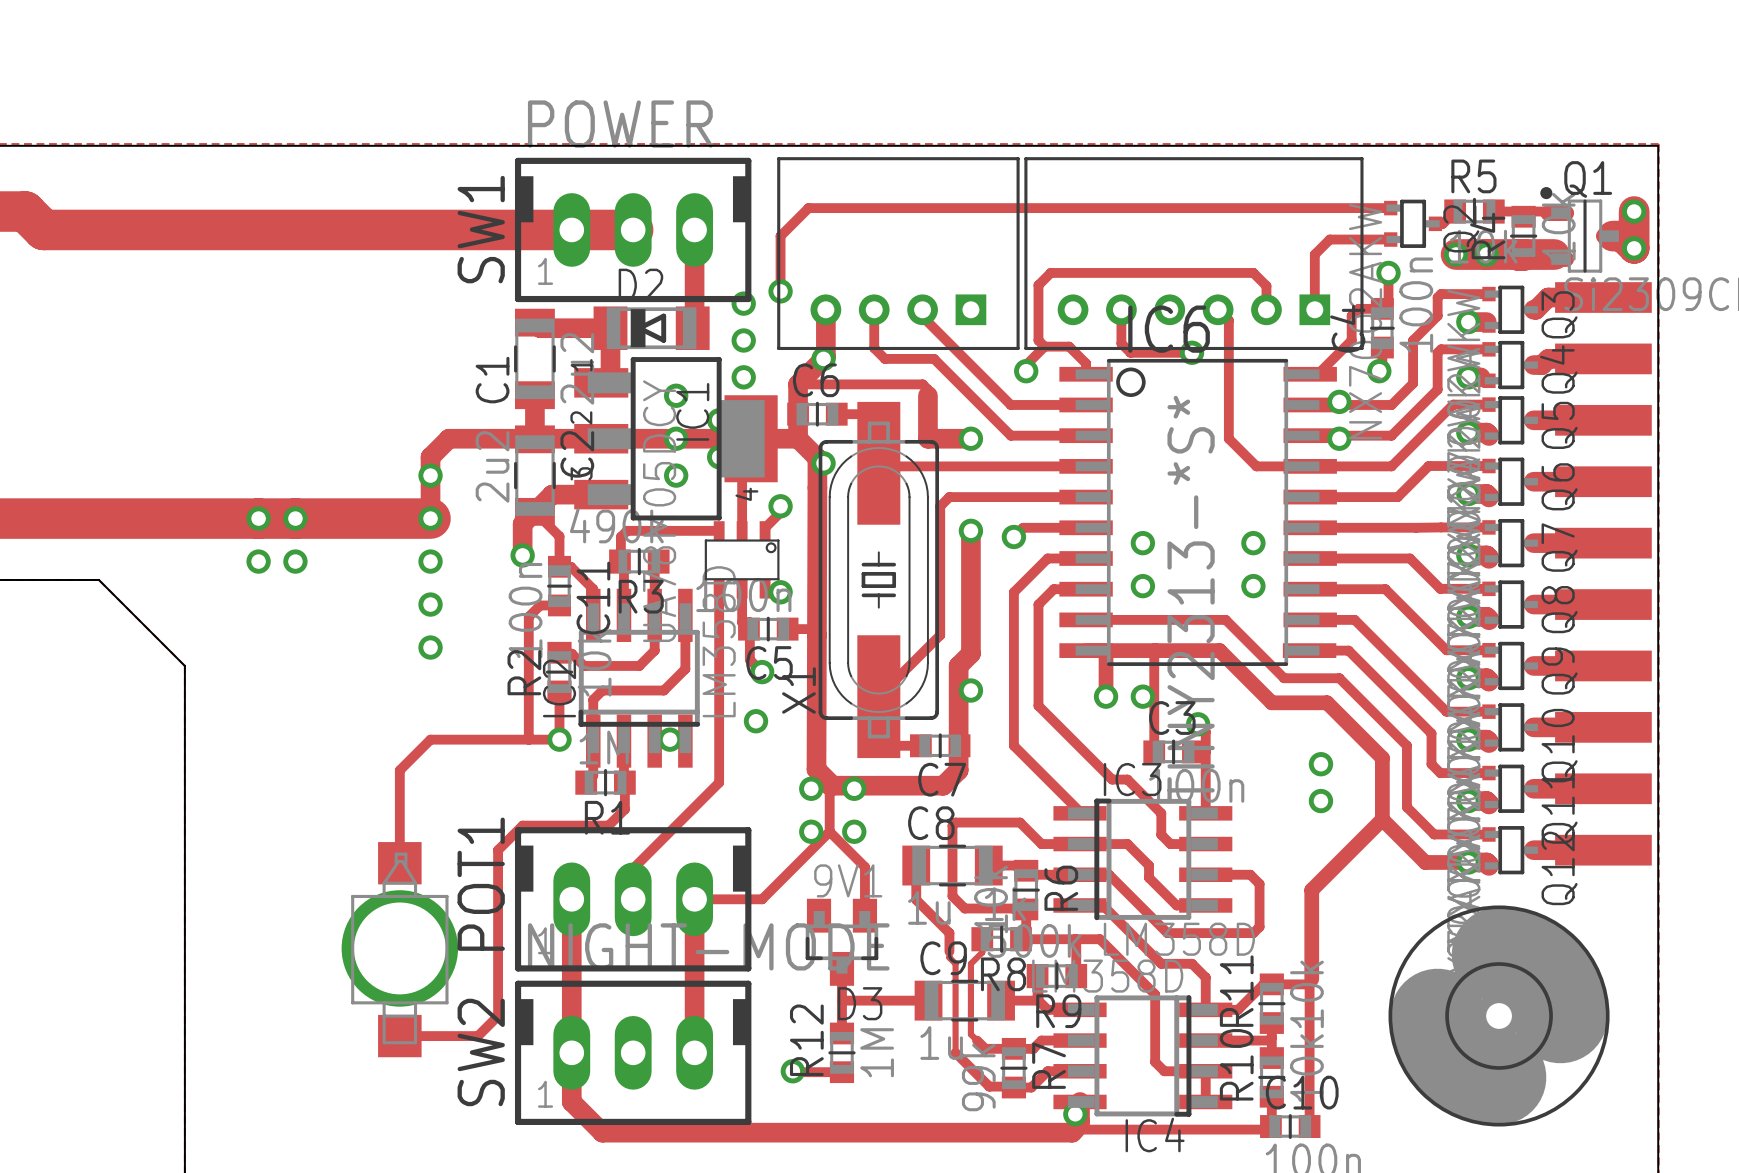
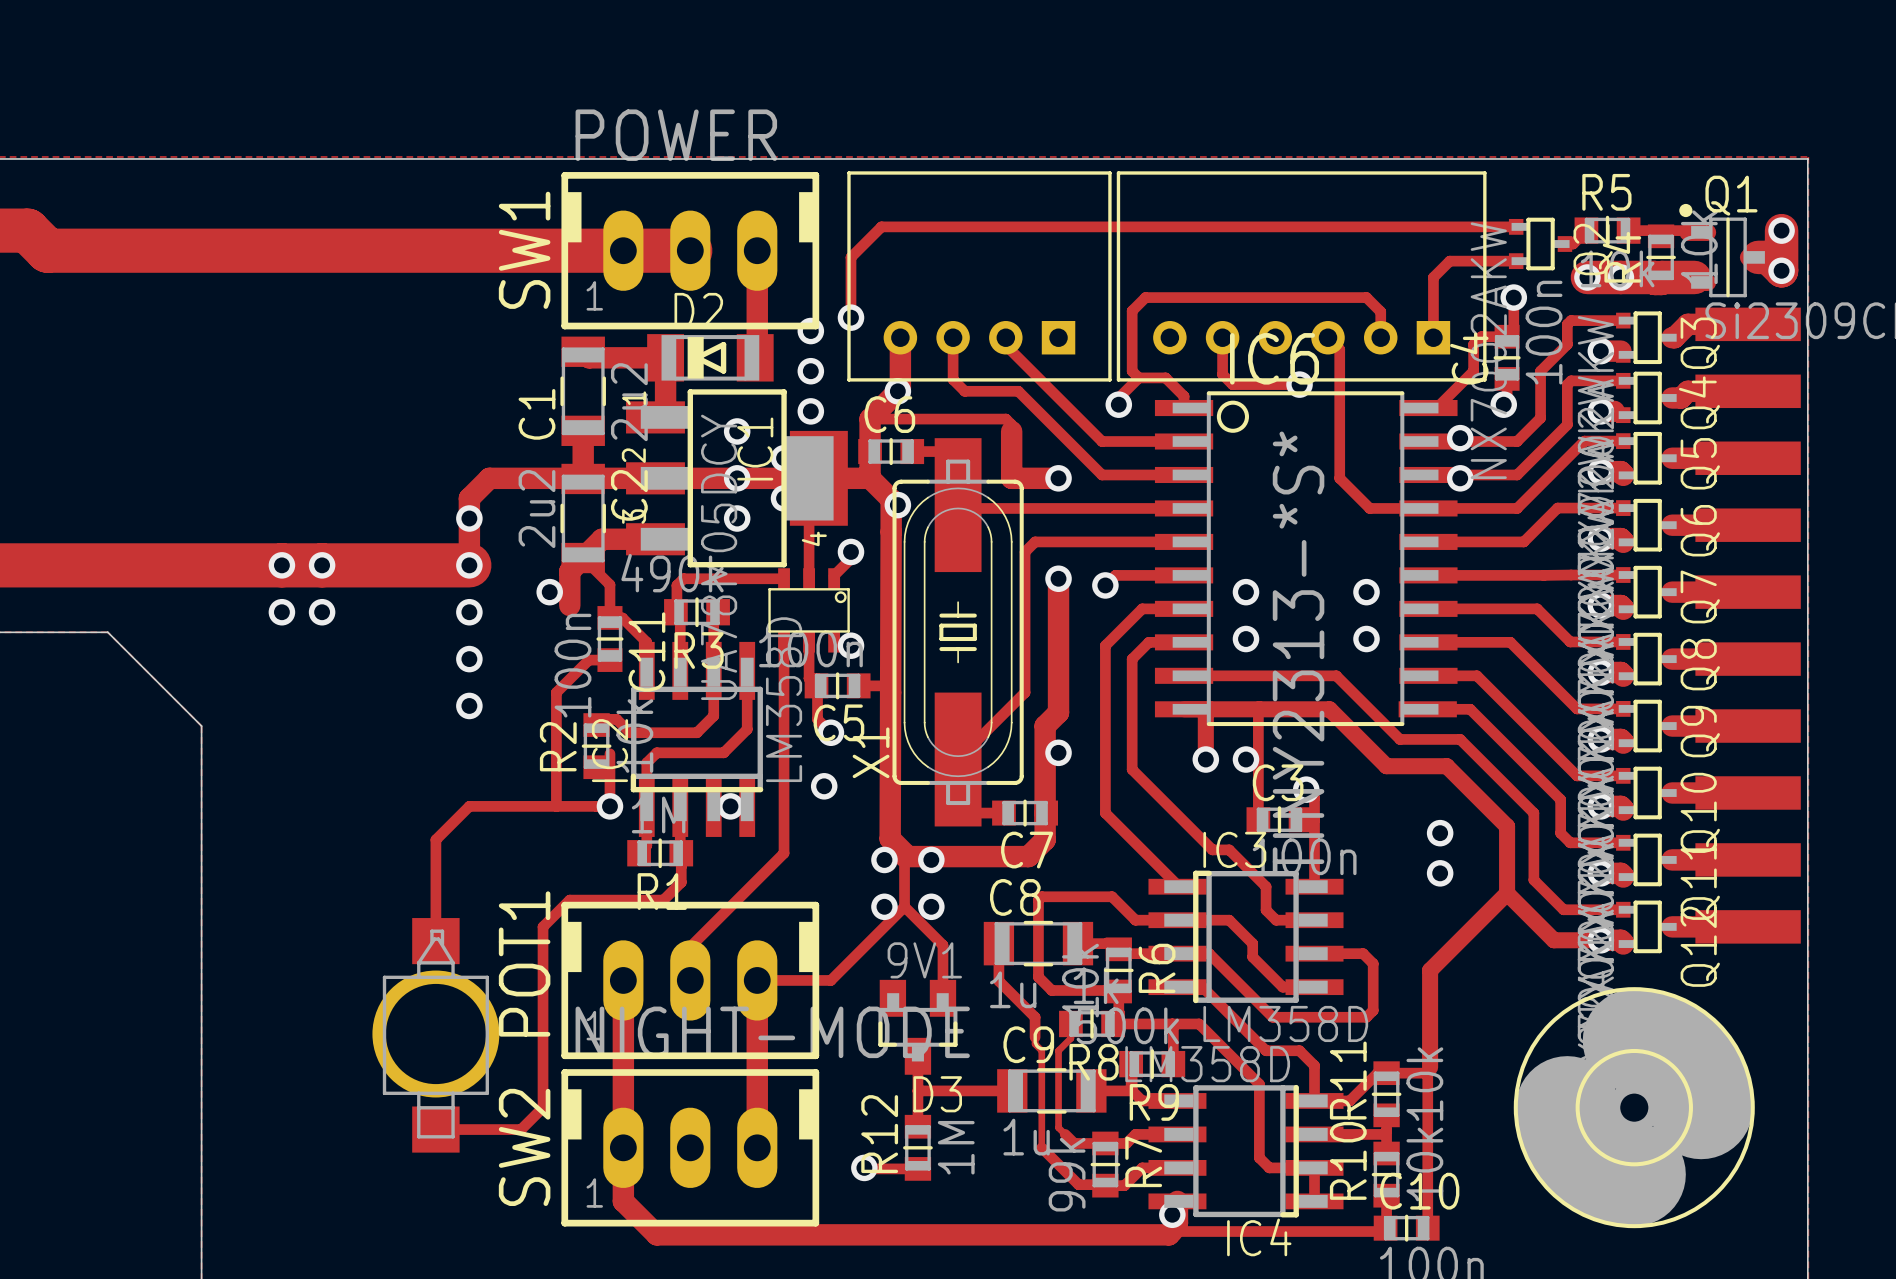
via position: (522, 555) -> (549, 592)
track: (528, 616) (528, 739) -> (576, 672) (556, 692) (556, 806)
track: (654, 650) (639, 665) (584, 665) (571, 653) (559, 652) -> (713, 709) (713, 716) (697, 732) (630, 732) (616, 719) (604, 719) (596, 725)
R2 position: (559, 672) -> (596, 746)

